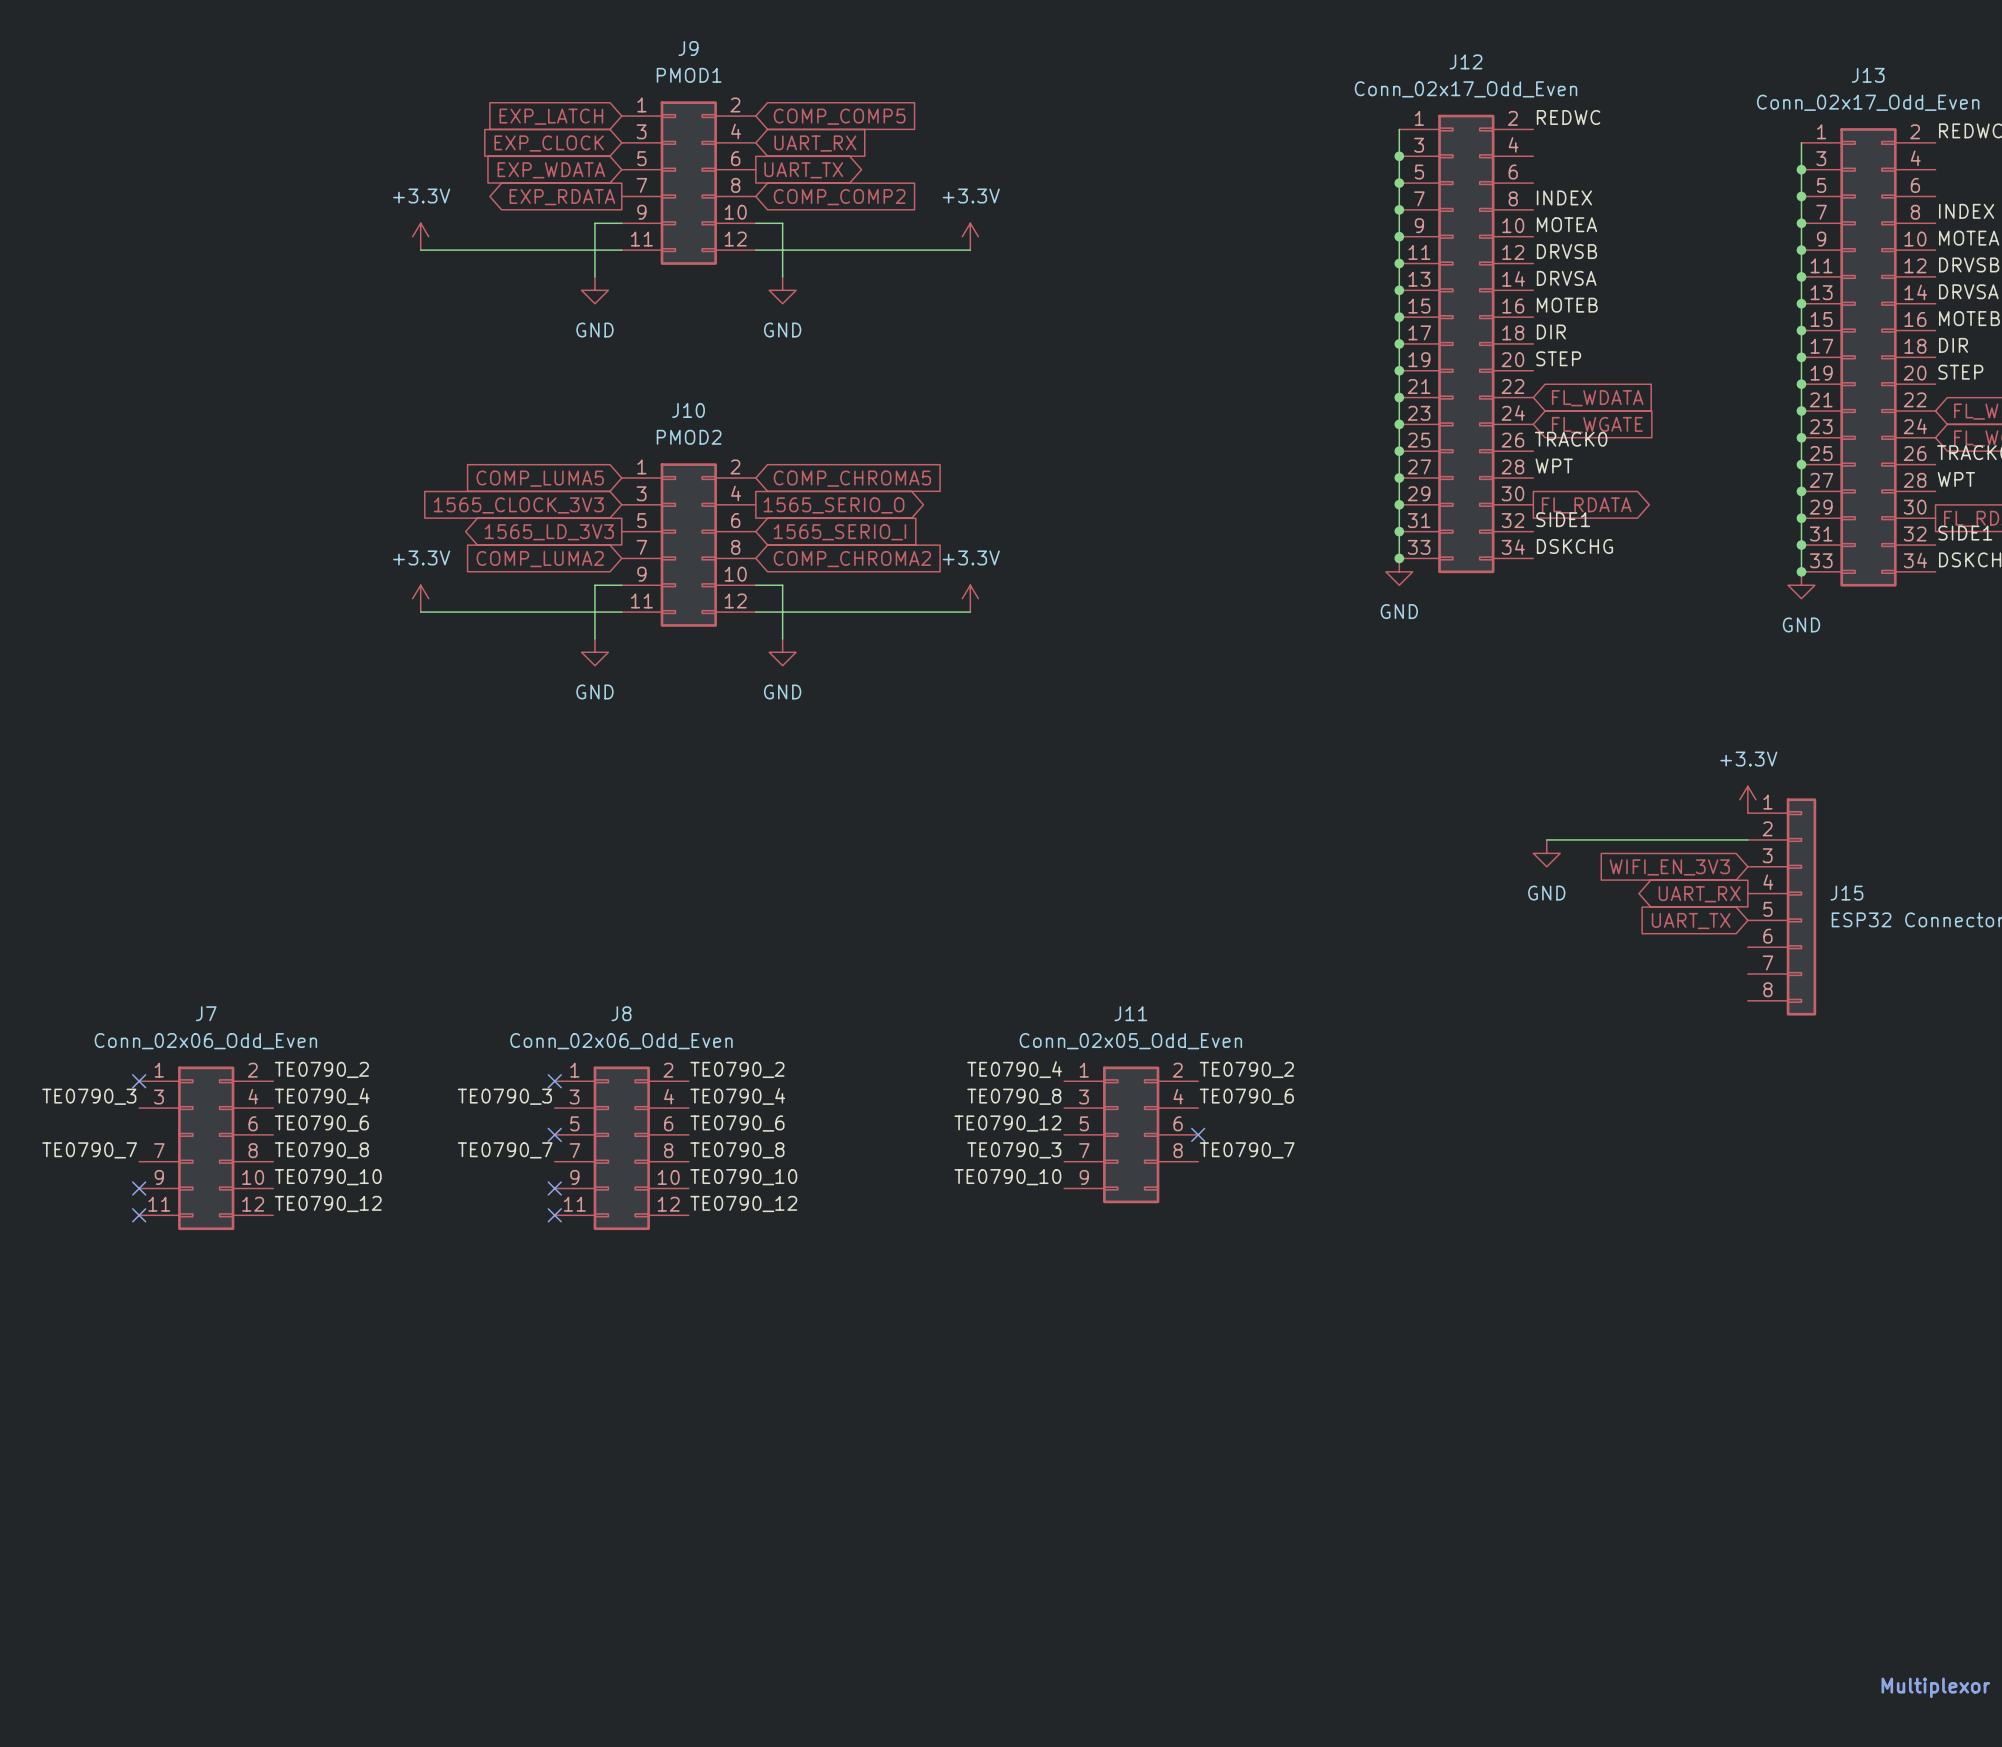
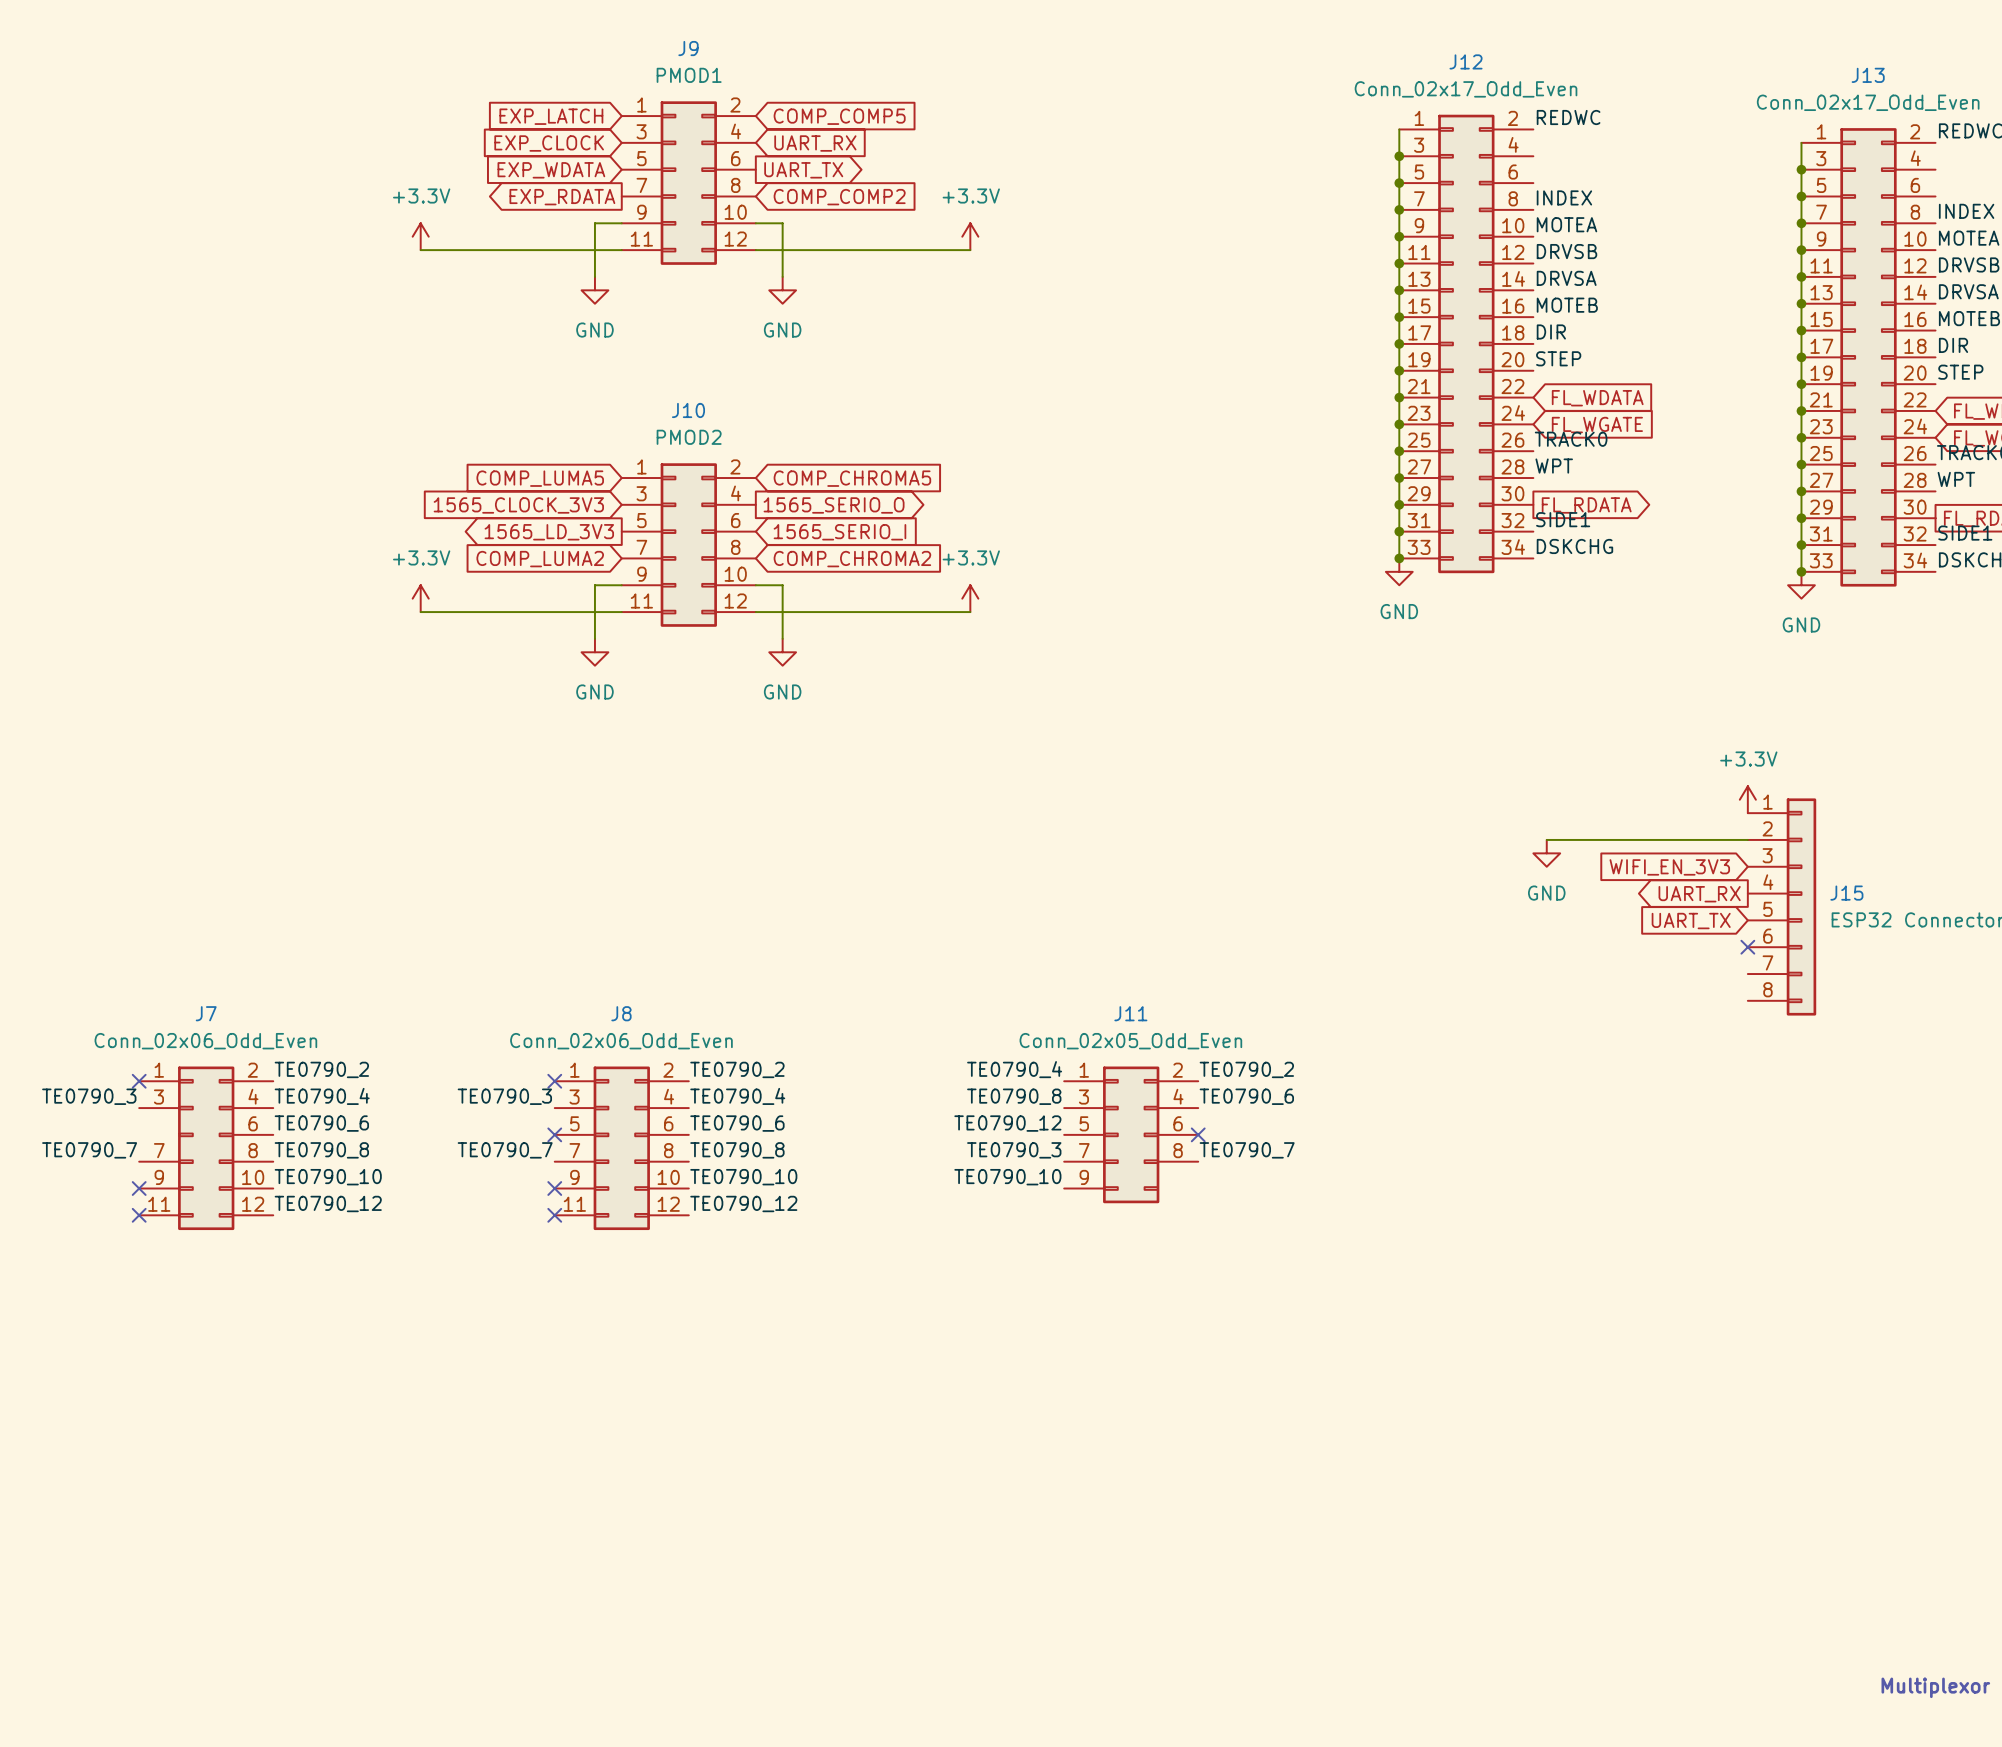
no-connect mark: none -> (1747, 947)

